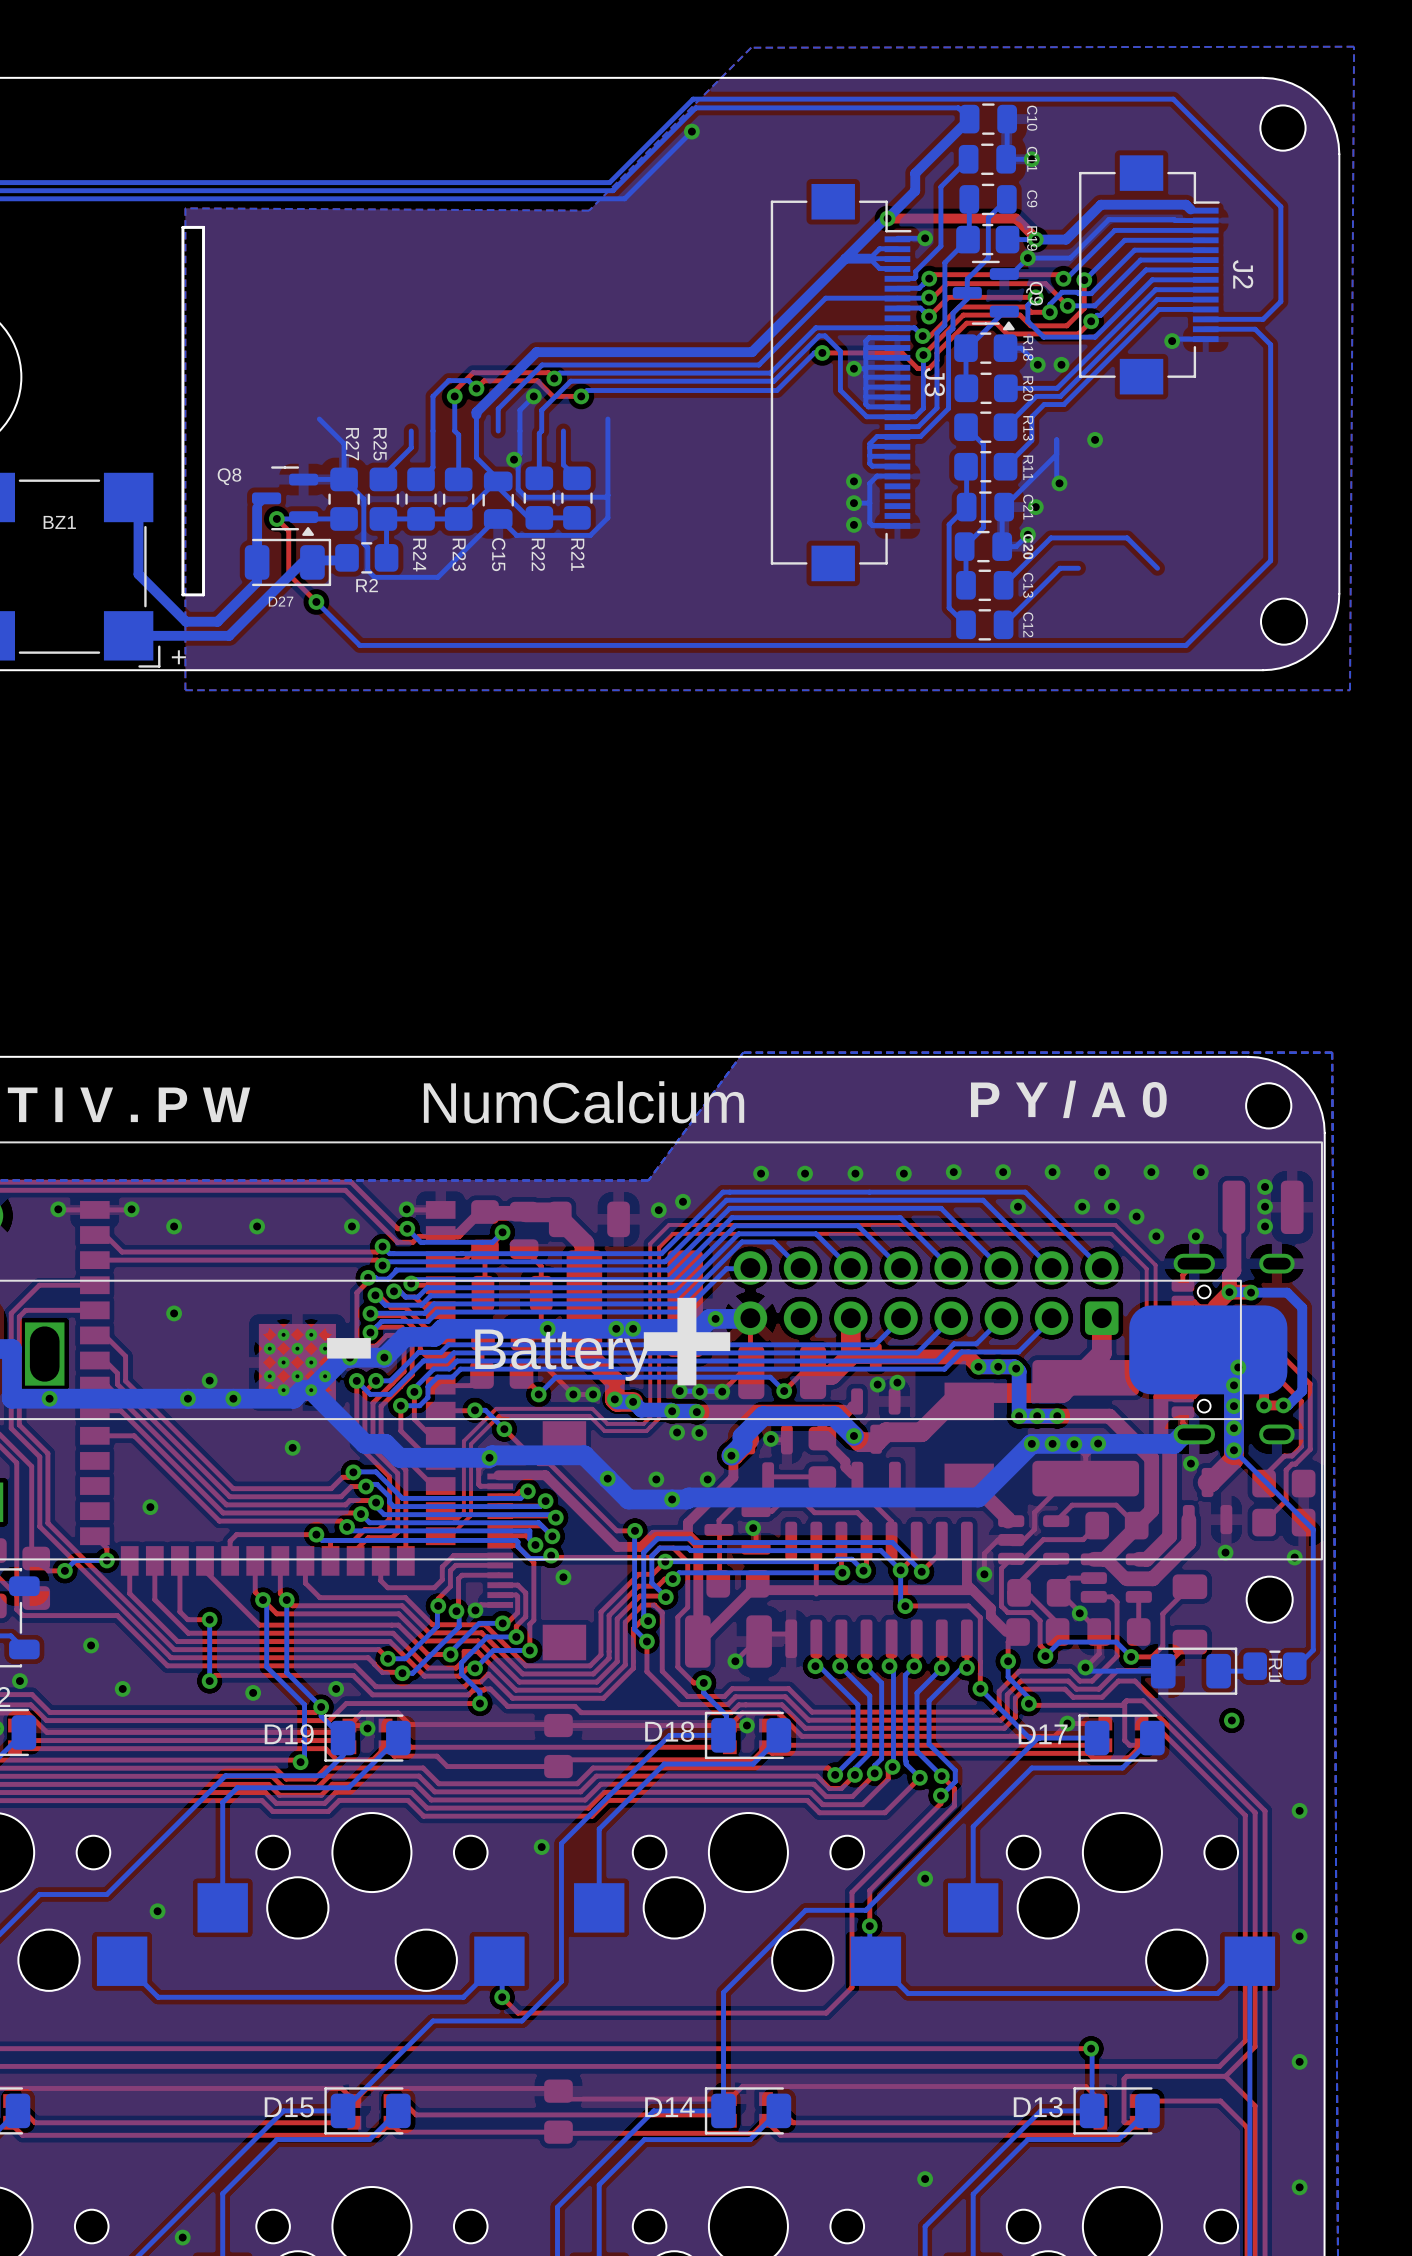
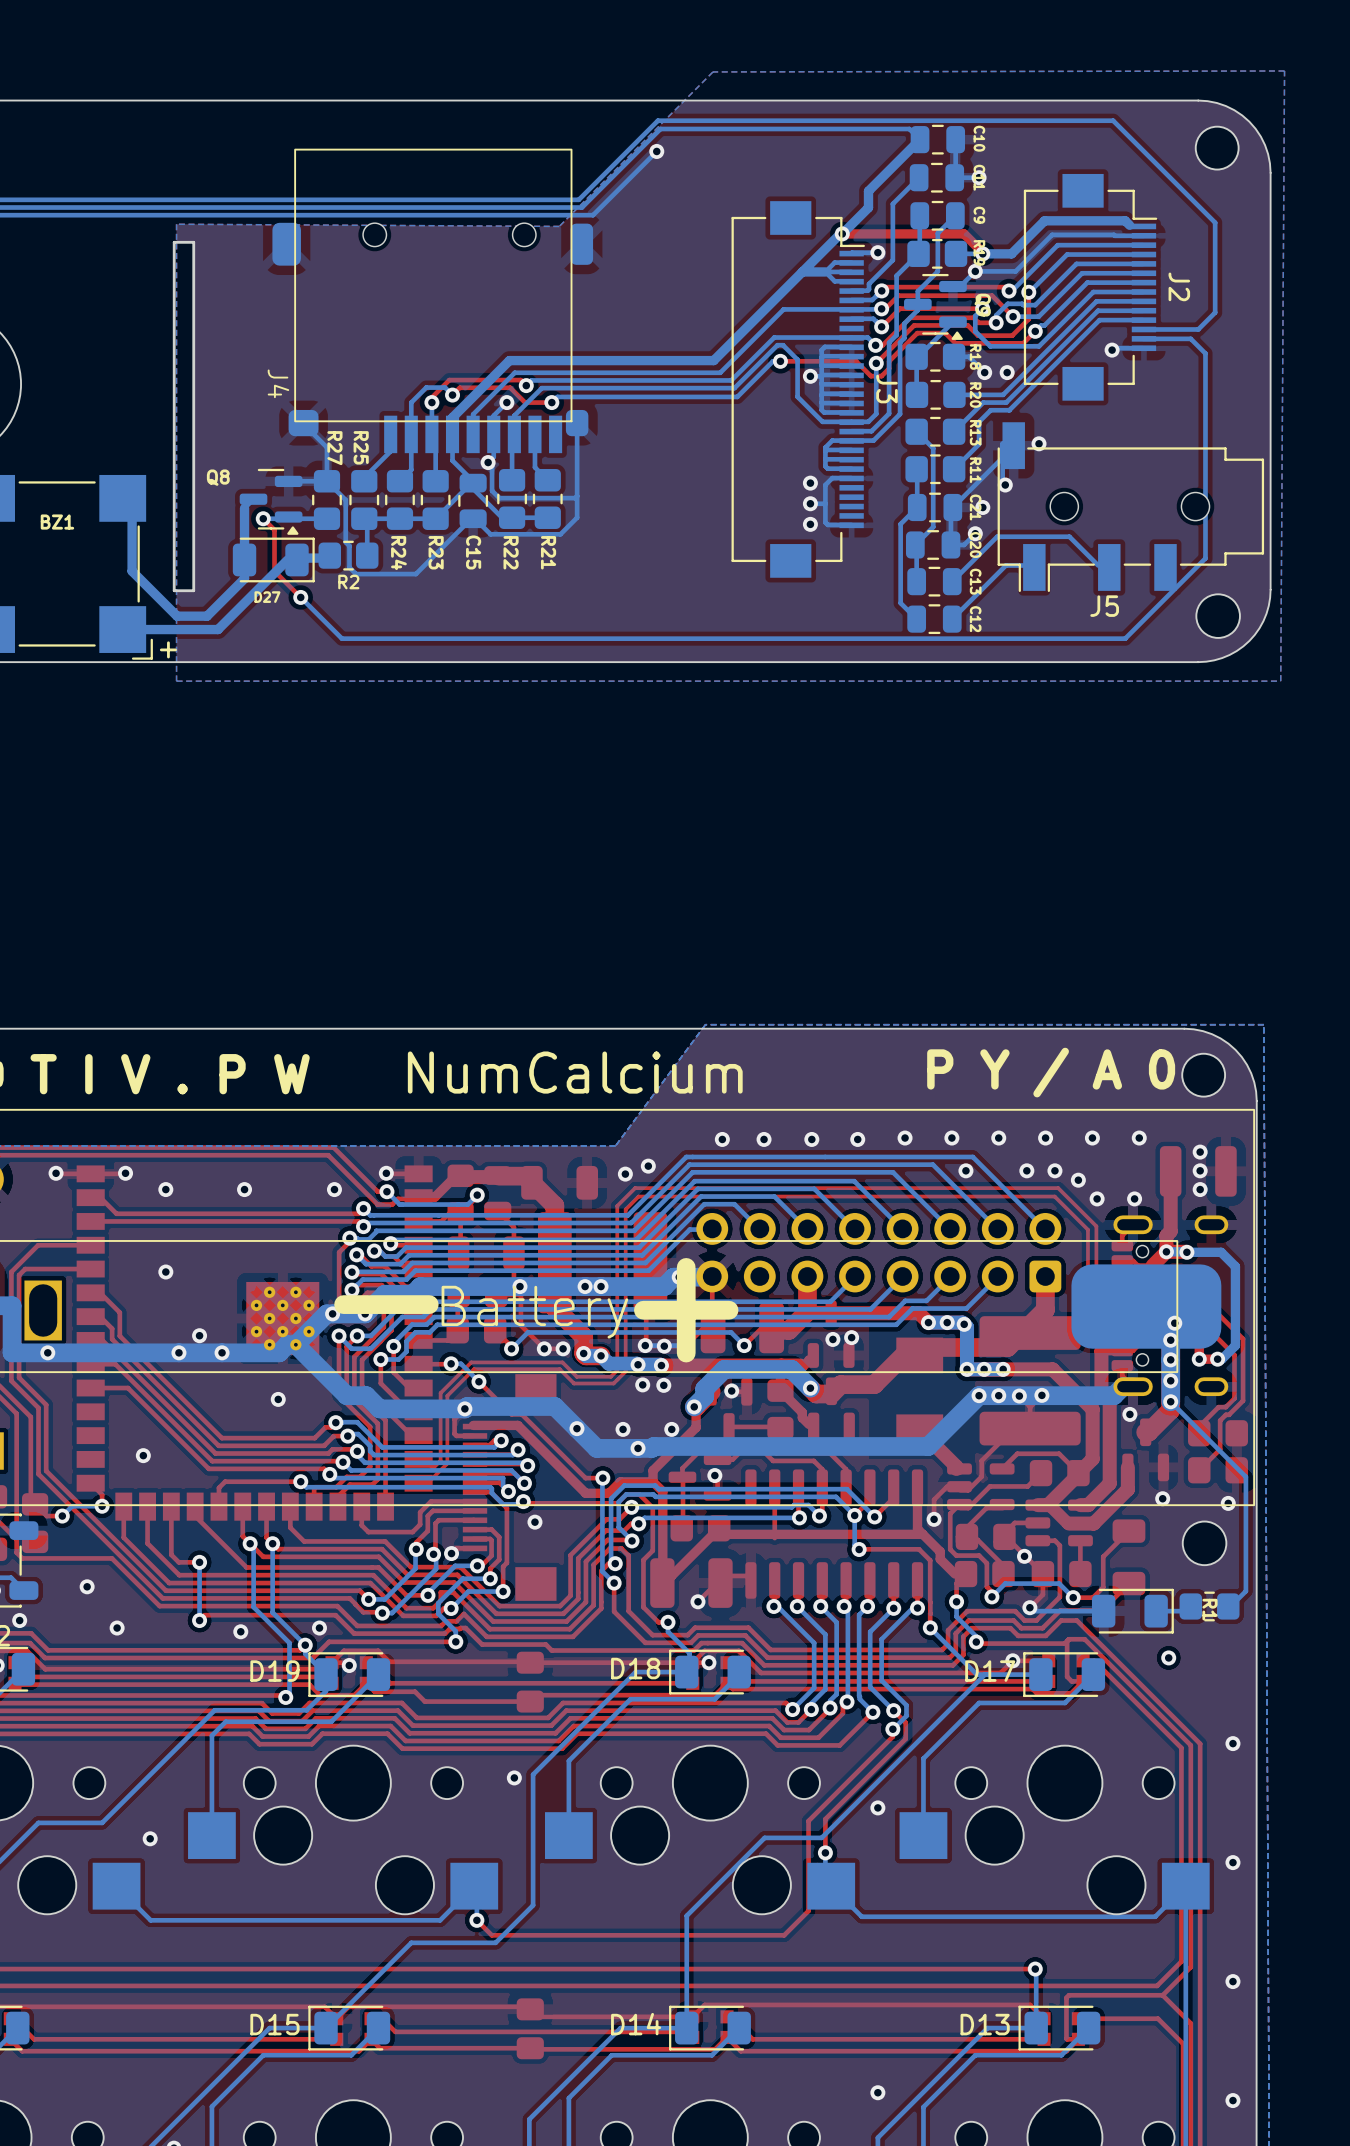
J4: none -> (432, 300)
J5: none -> (1130, 507)

